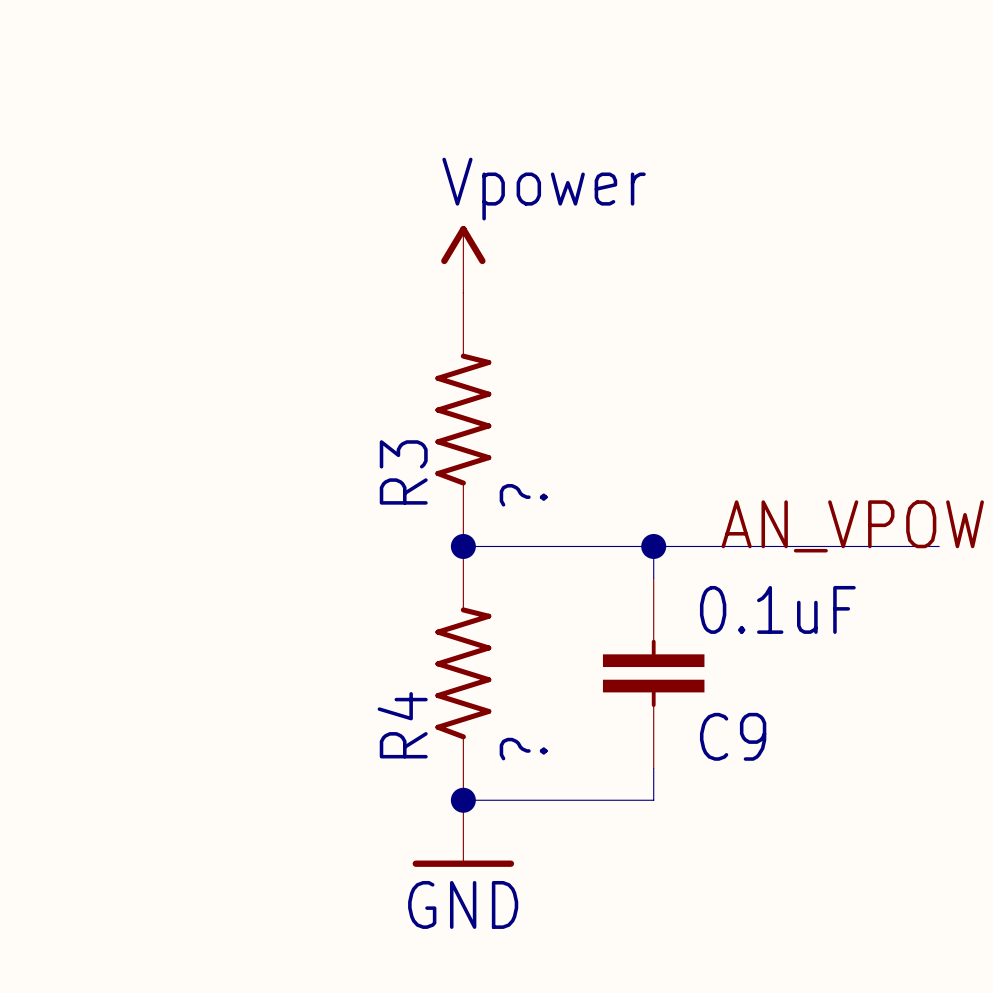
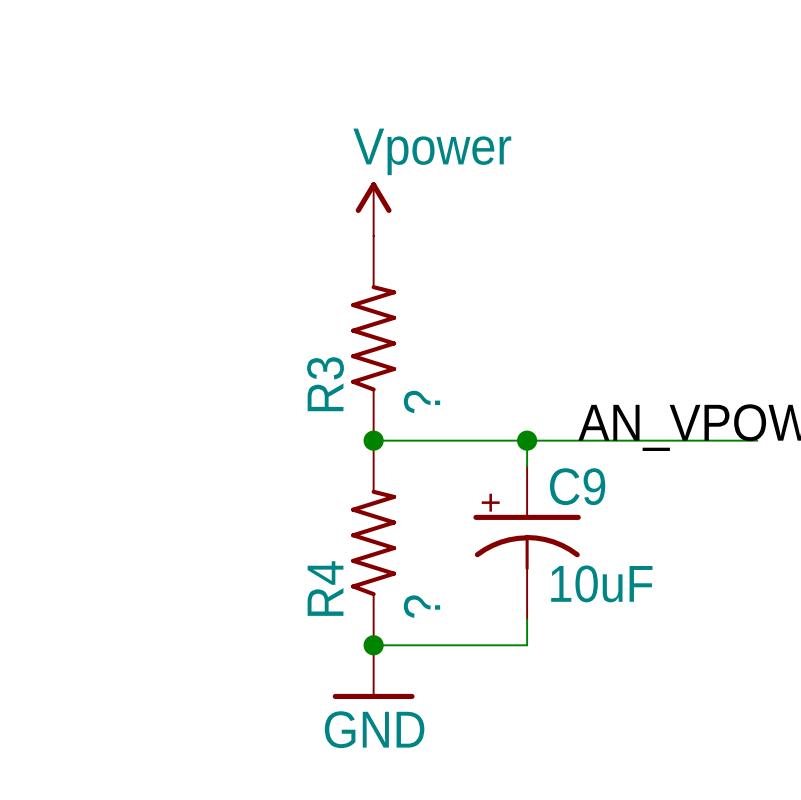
C9 symbol: [602, 578, 705, 769] -> [473, 466, 581, 620]
C9 value: 0.1uF (777, 609) -> 10uF (601, 583)
C9 name position: C9 (733, 736) -> C9 (577, 486)

